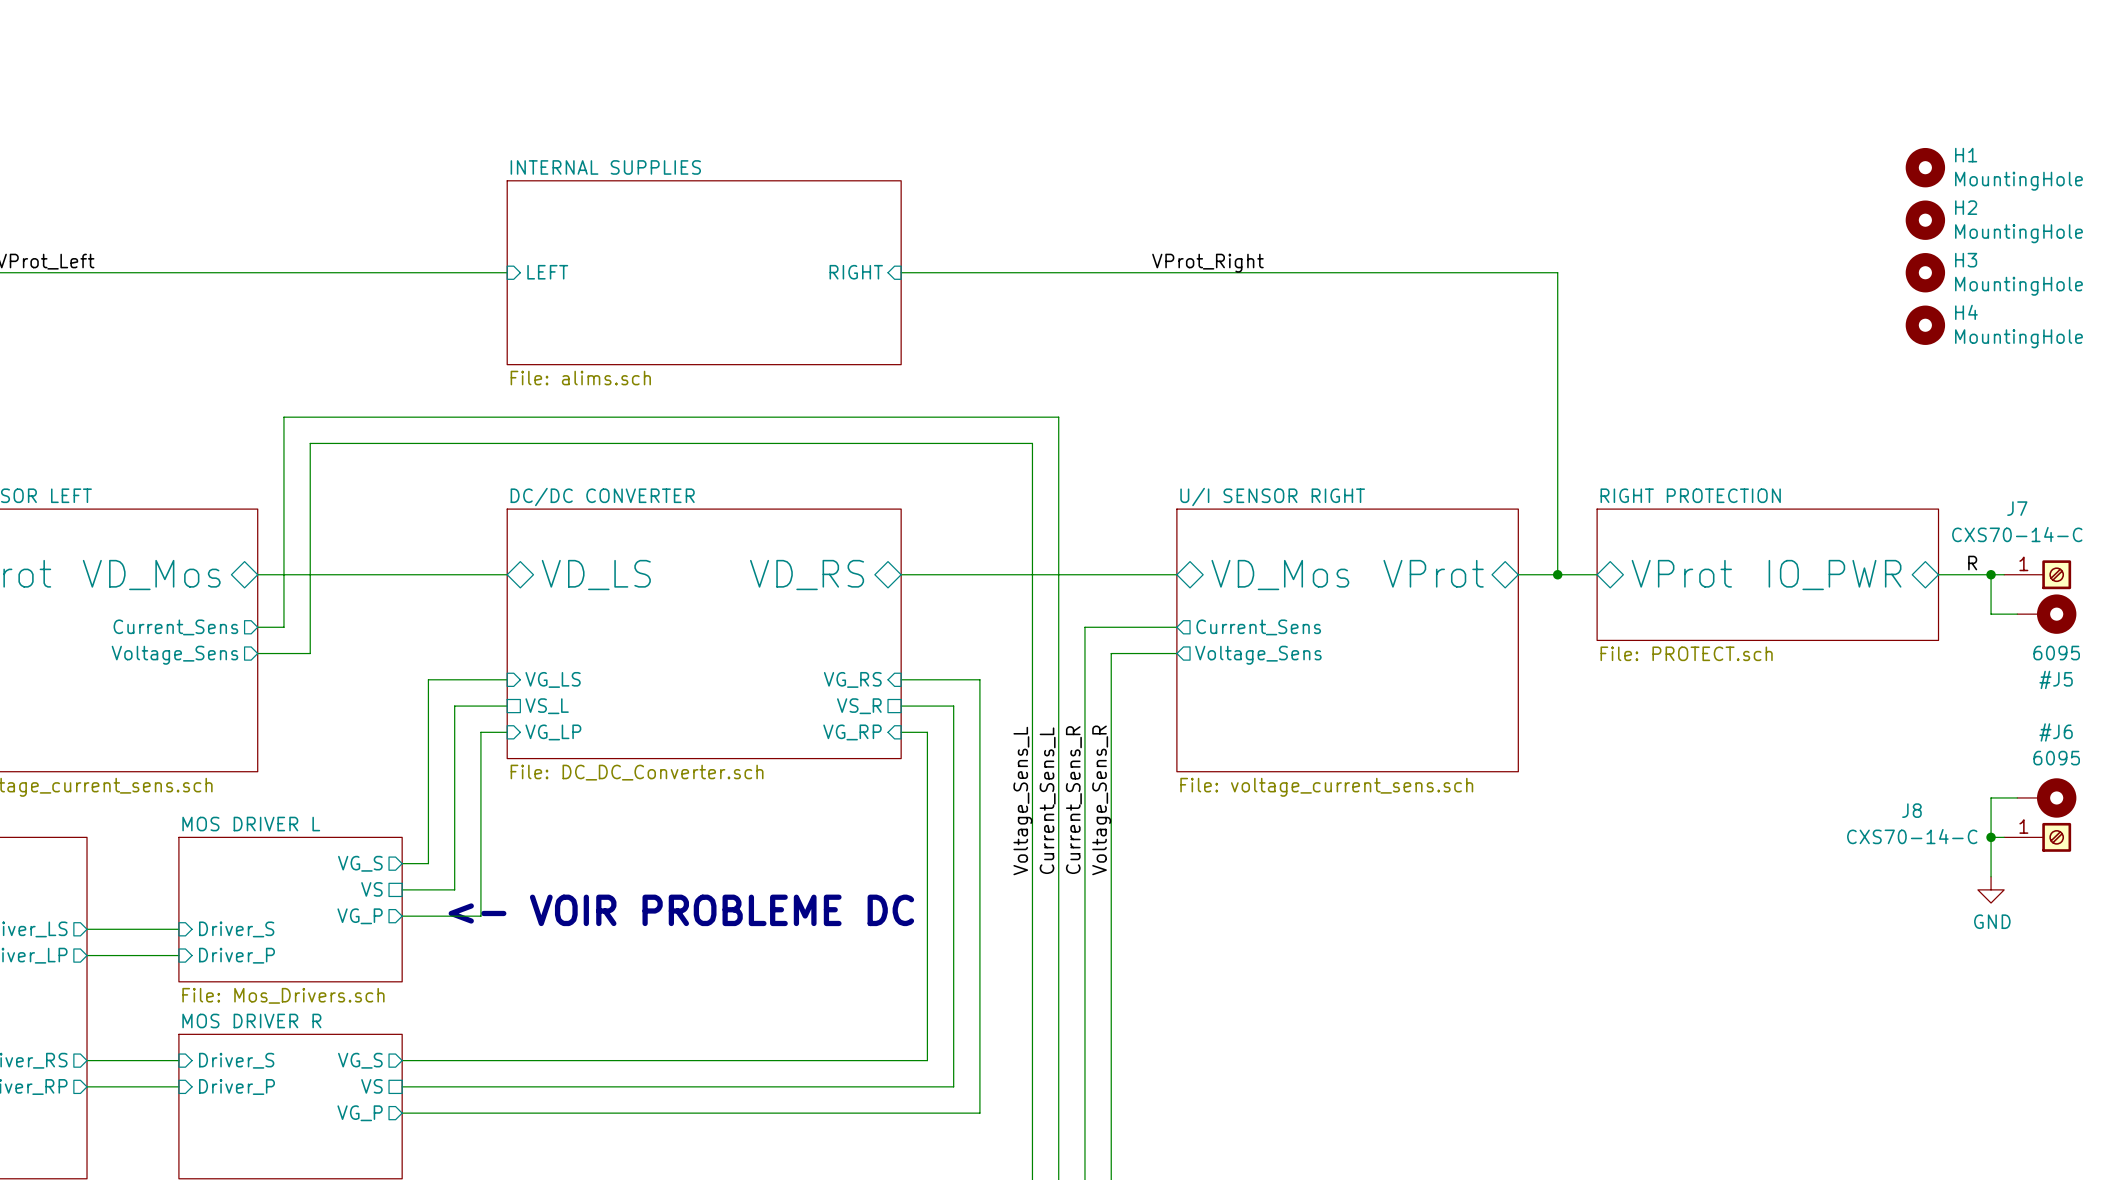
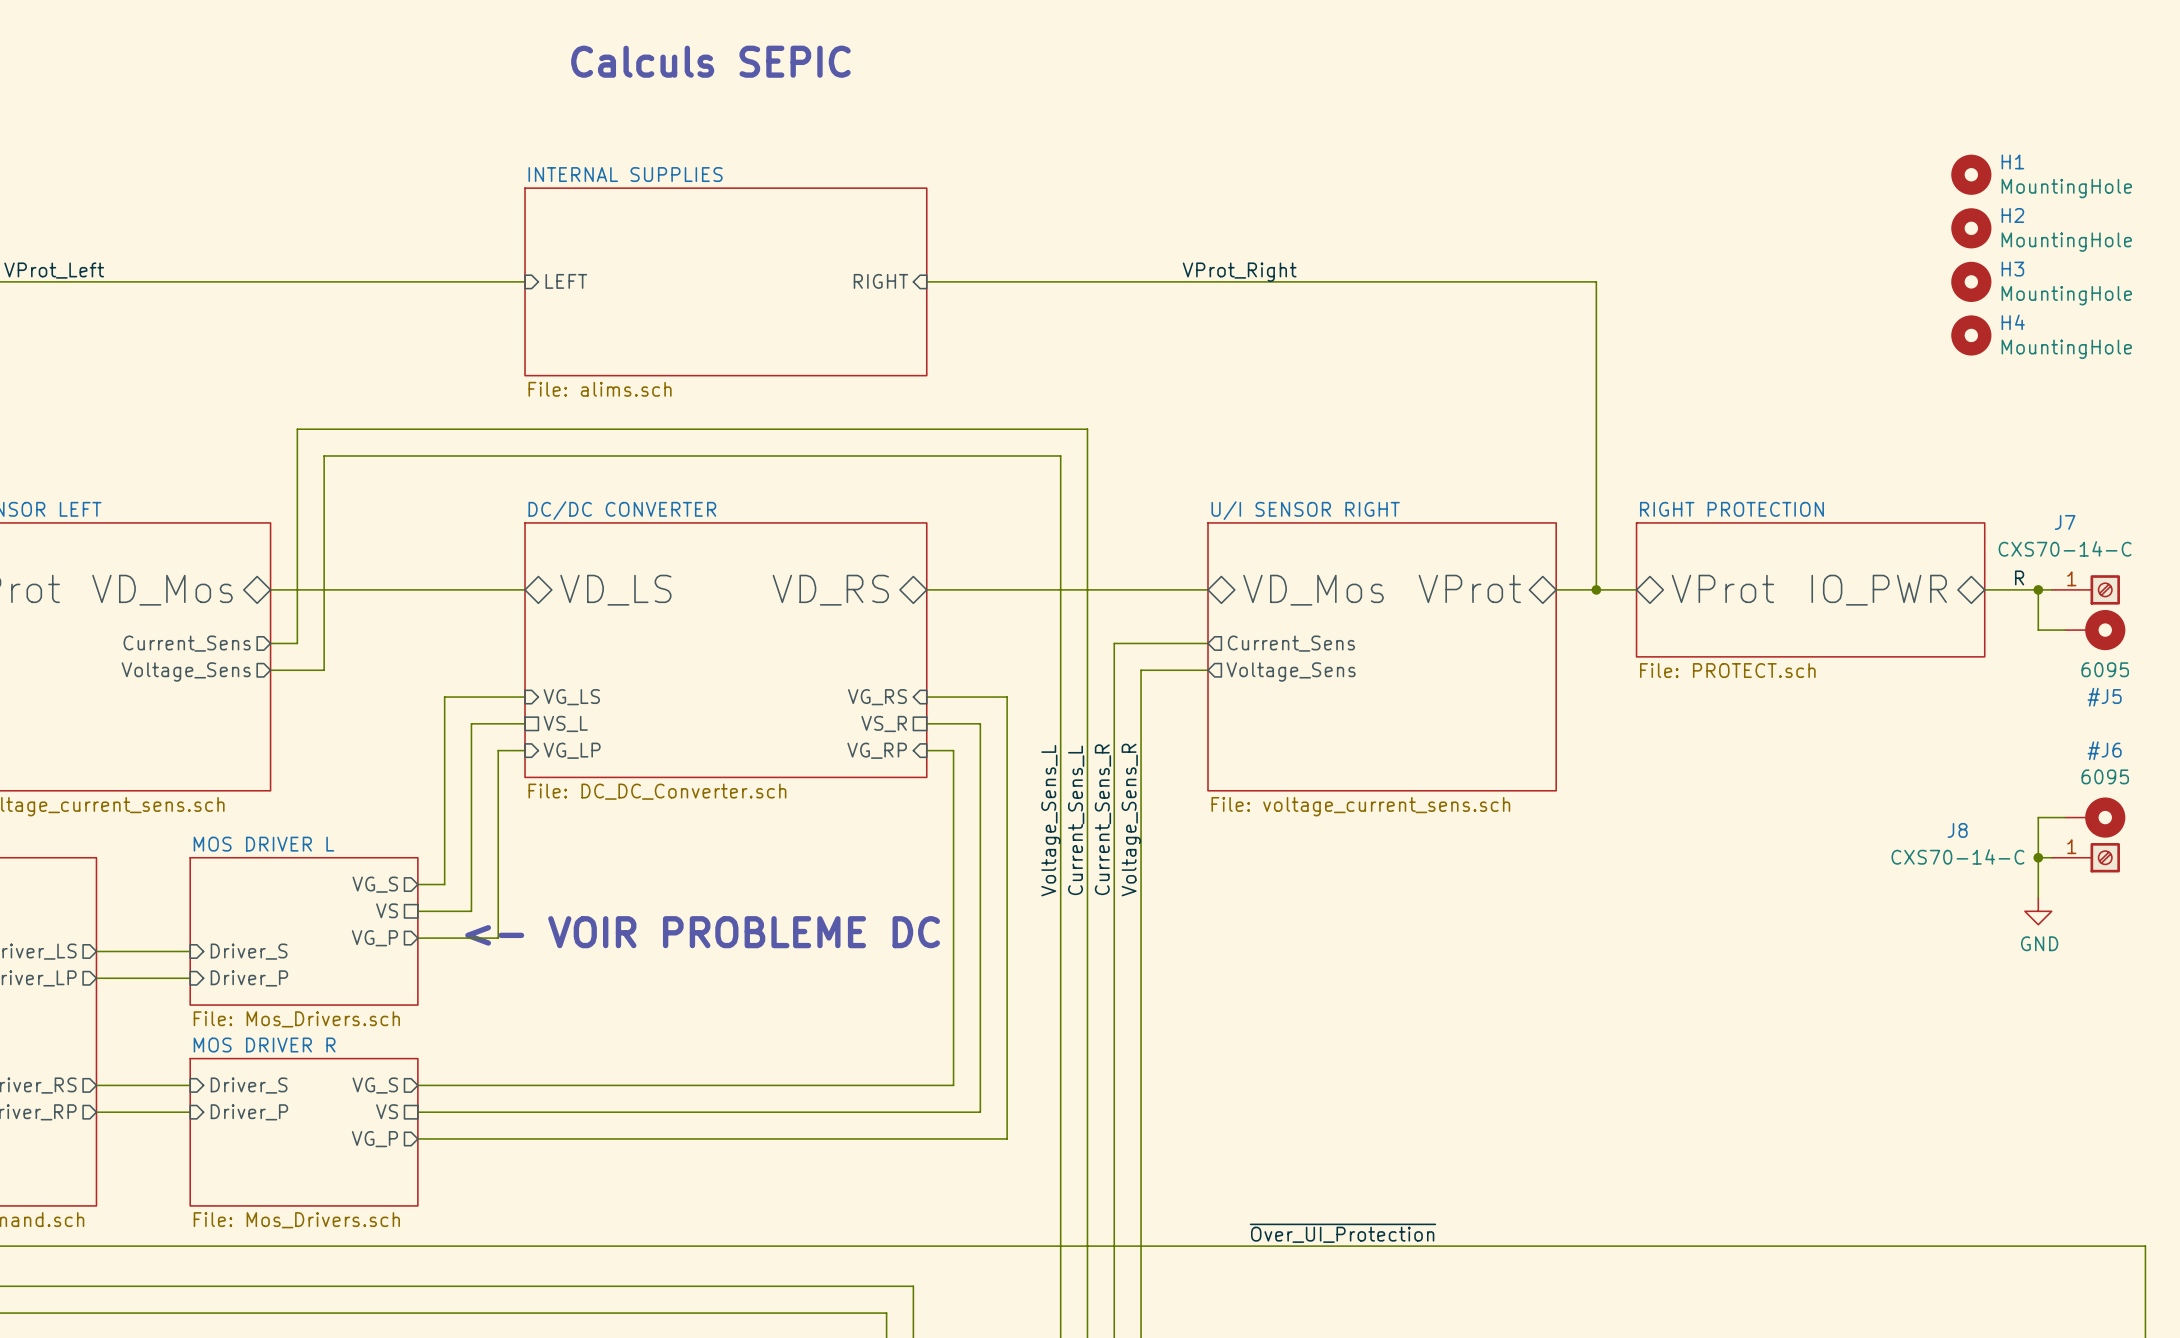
text: none -> Calculs SEPIC (710, 61)

